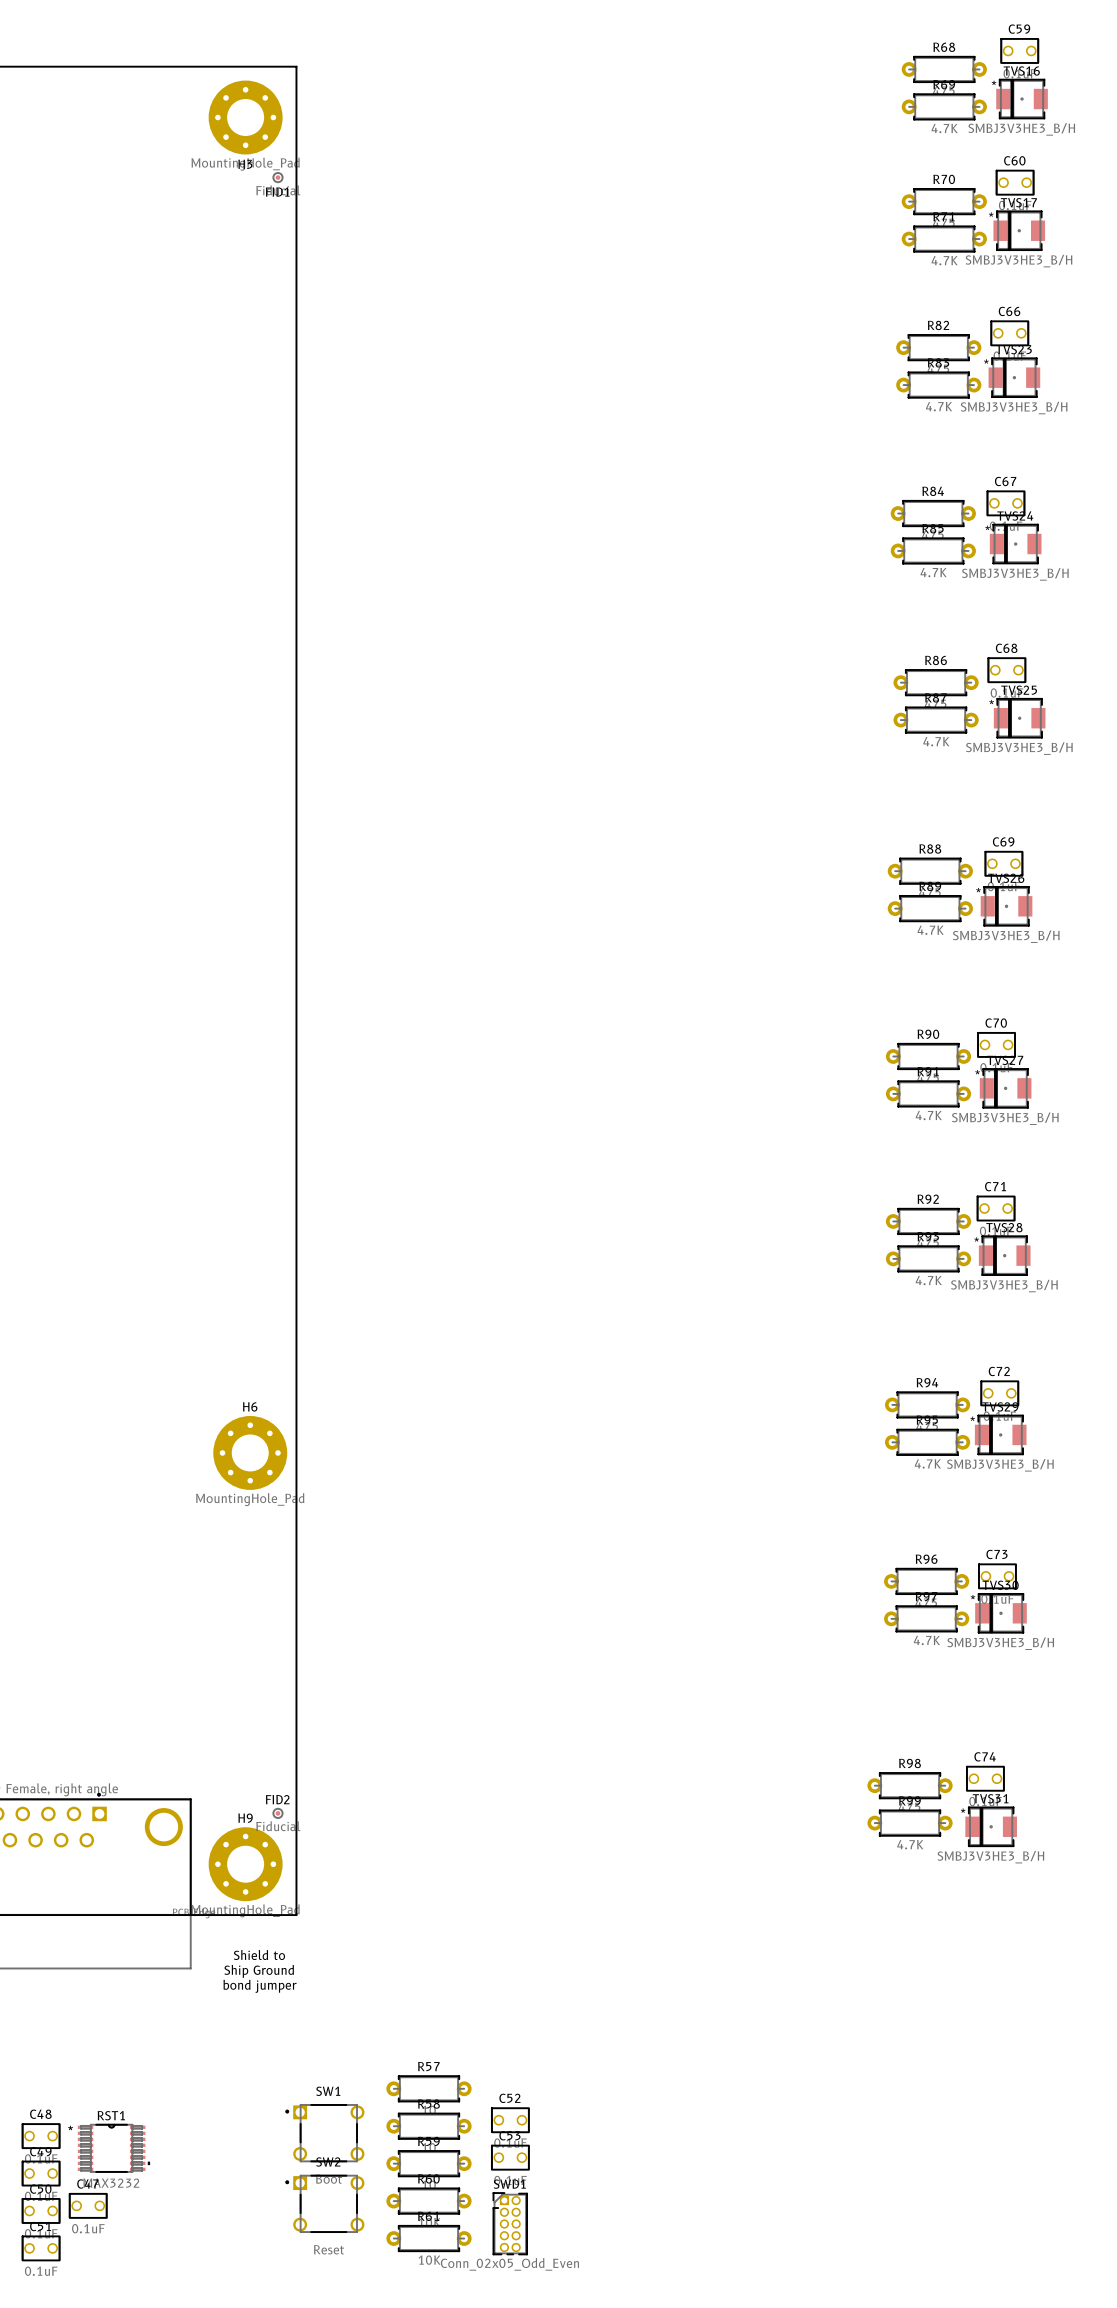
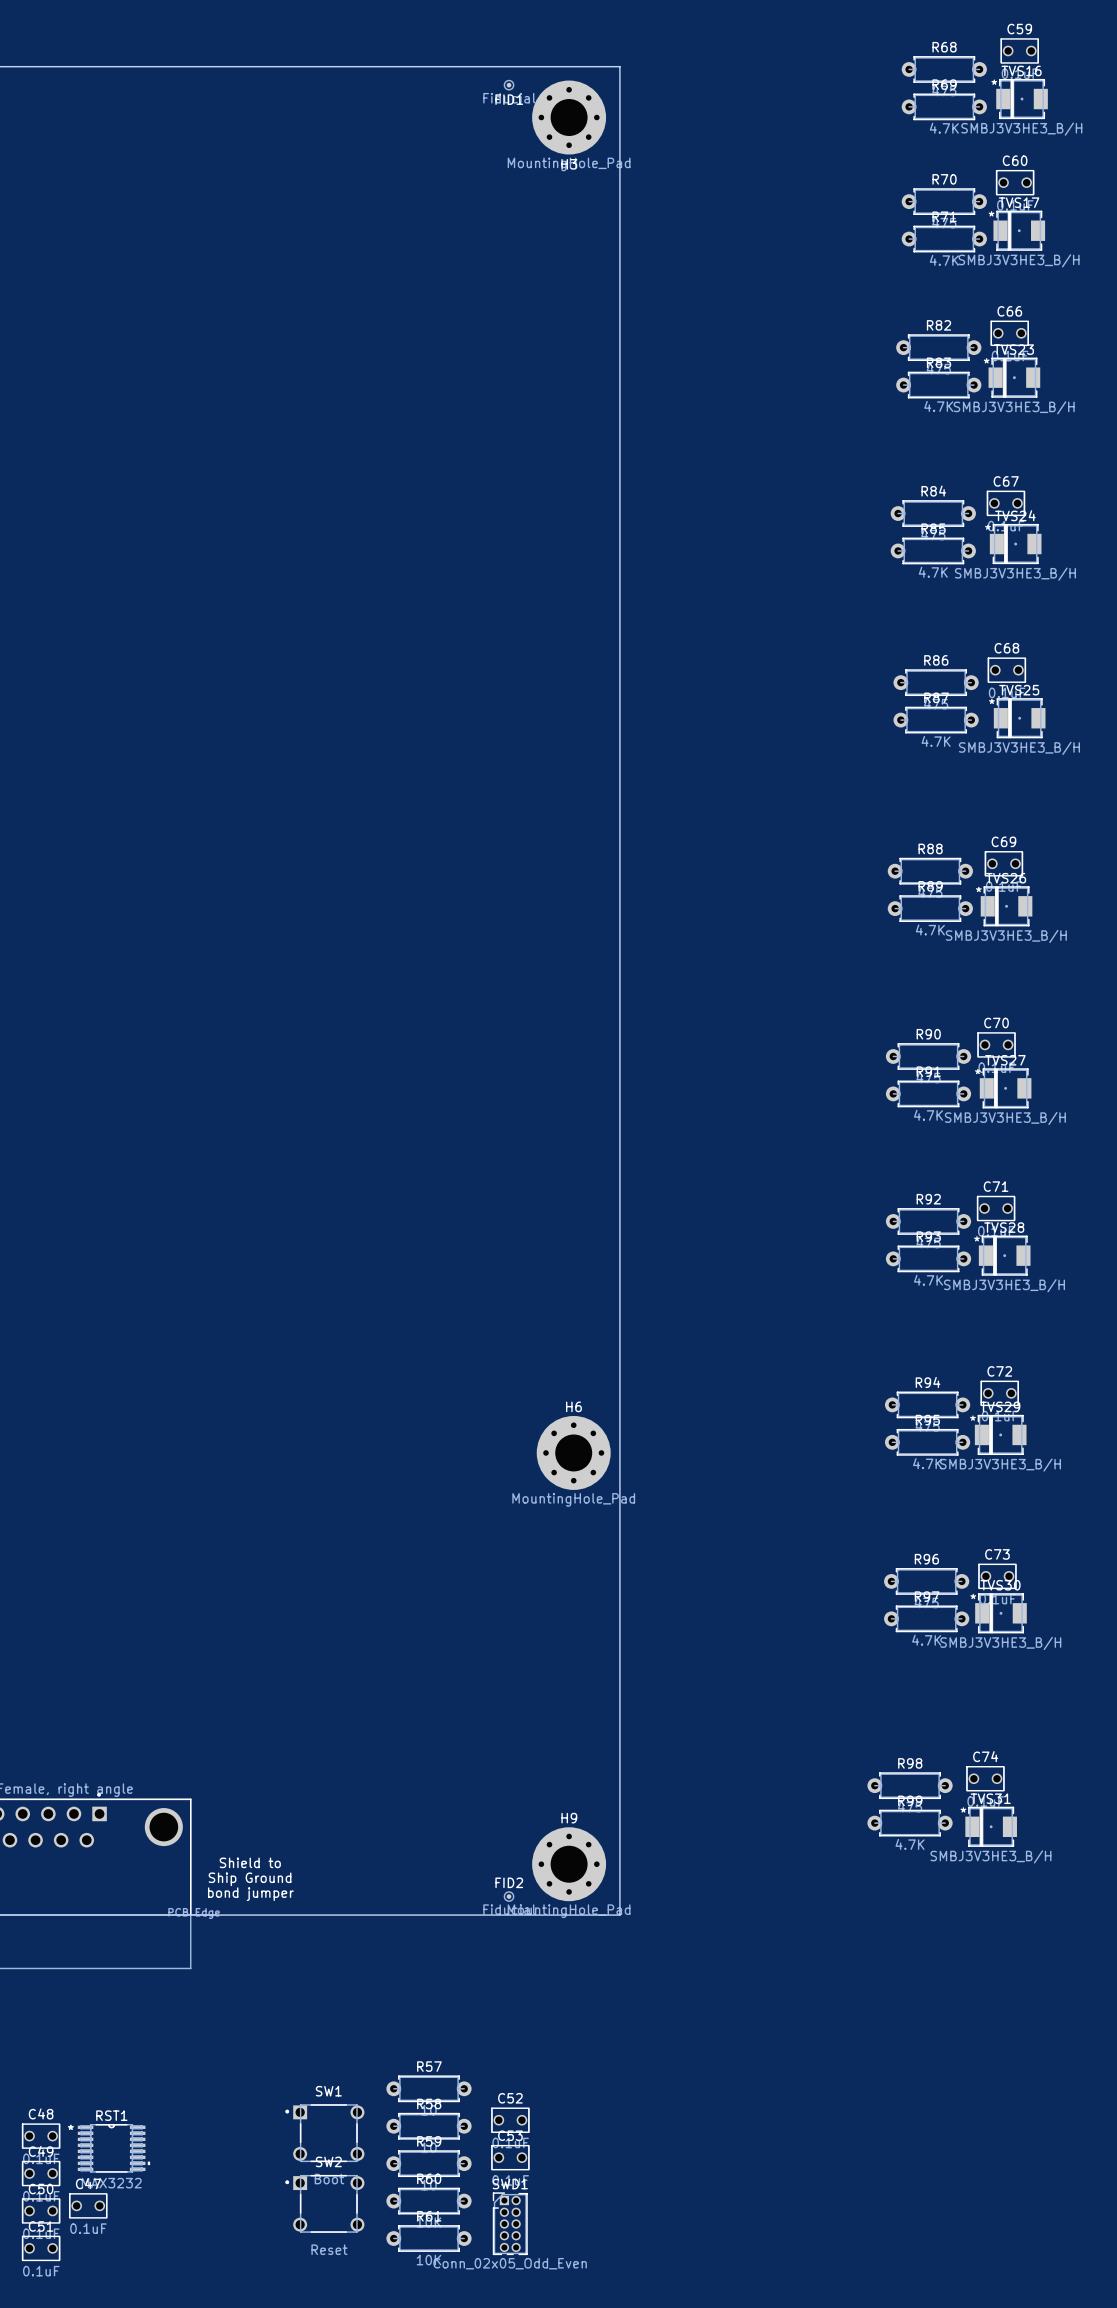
board edge: (296, 66) (296, 1915) -> (296, 66) (619, 66) (619, 1915) (296, 1915)
H3 position: (245, 117) -> (569, 117)
FID1 position: (277, 177) -> (509, 85)
H6 position: (250, 1452) -> (573, 1452)
FID2 position: (277, 1813) -> (509, 1896)
H9 position: (245, 1864) -> (569, 1864)
text position: Shield to (259, 1955) -> Shield to (250, 1862)
text position: Ship Ground (259, 1971) -> Ship Ground (250, 1879)
text position: bond jumper (260, 1986) -> bond jumper (250, 1894)

